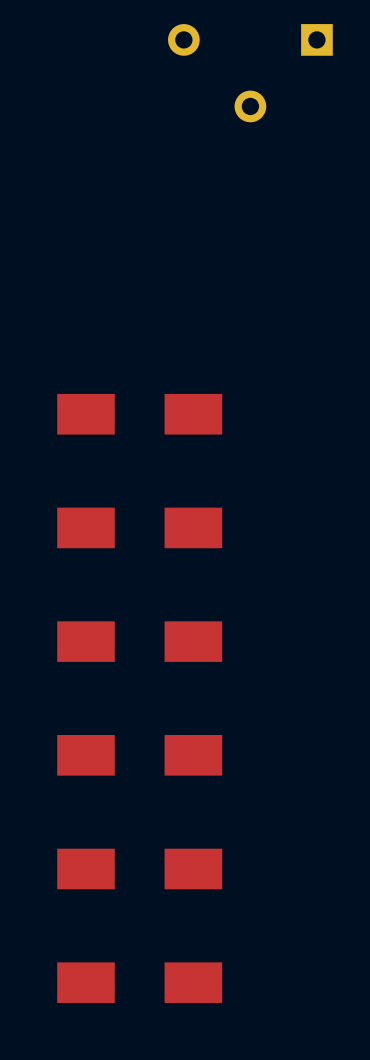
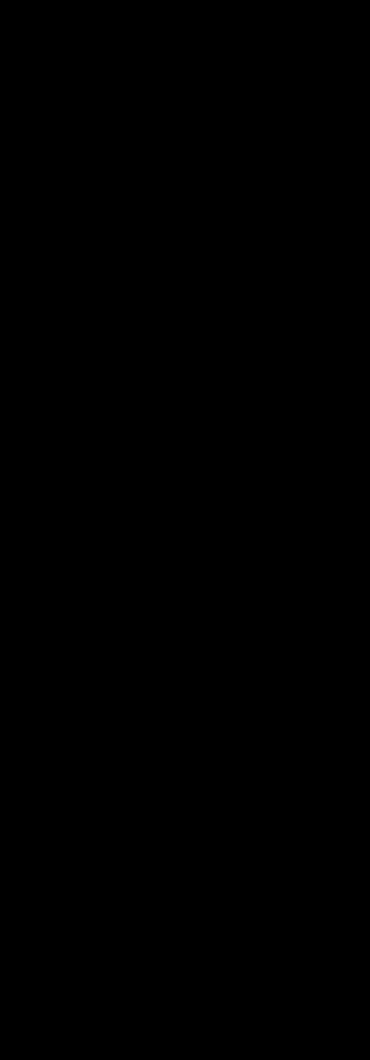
part: (250, 73) -> none
part: (139, 414) -> none
part: (139, 527) -> none
part: (139, 641) -> none
part: (139, 755) -> none
part: (139, 868) -> none
part: (139, 982) -> none

